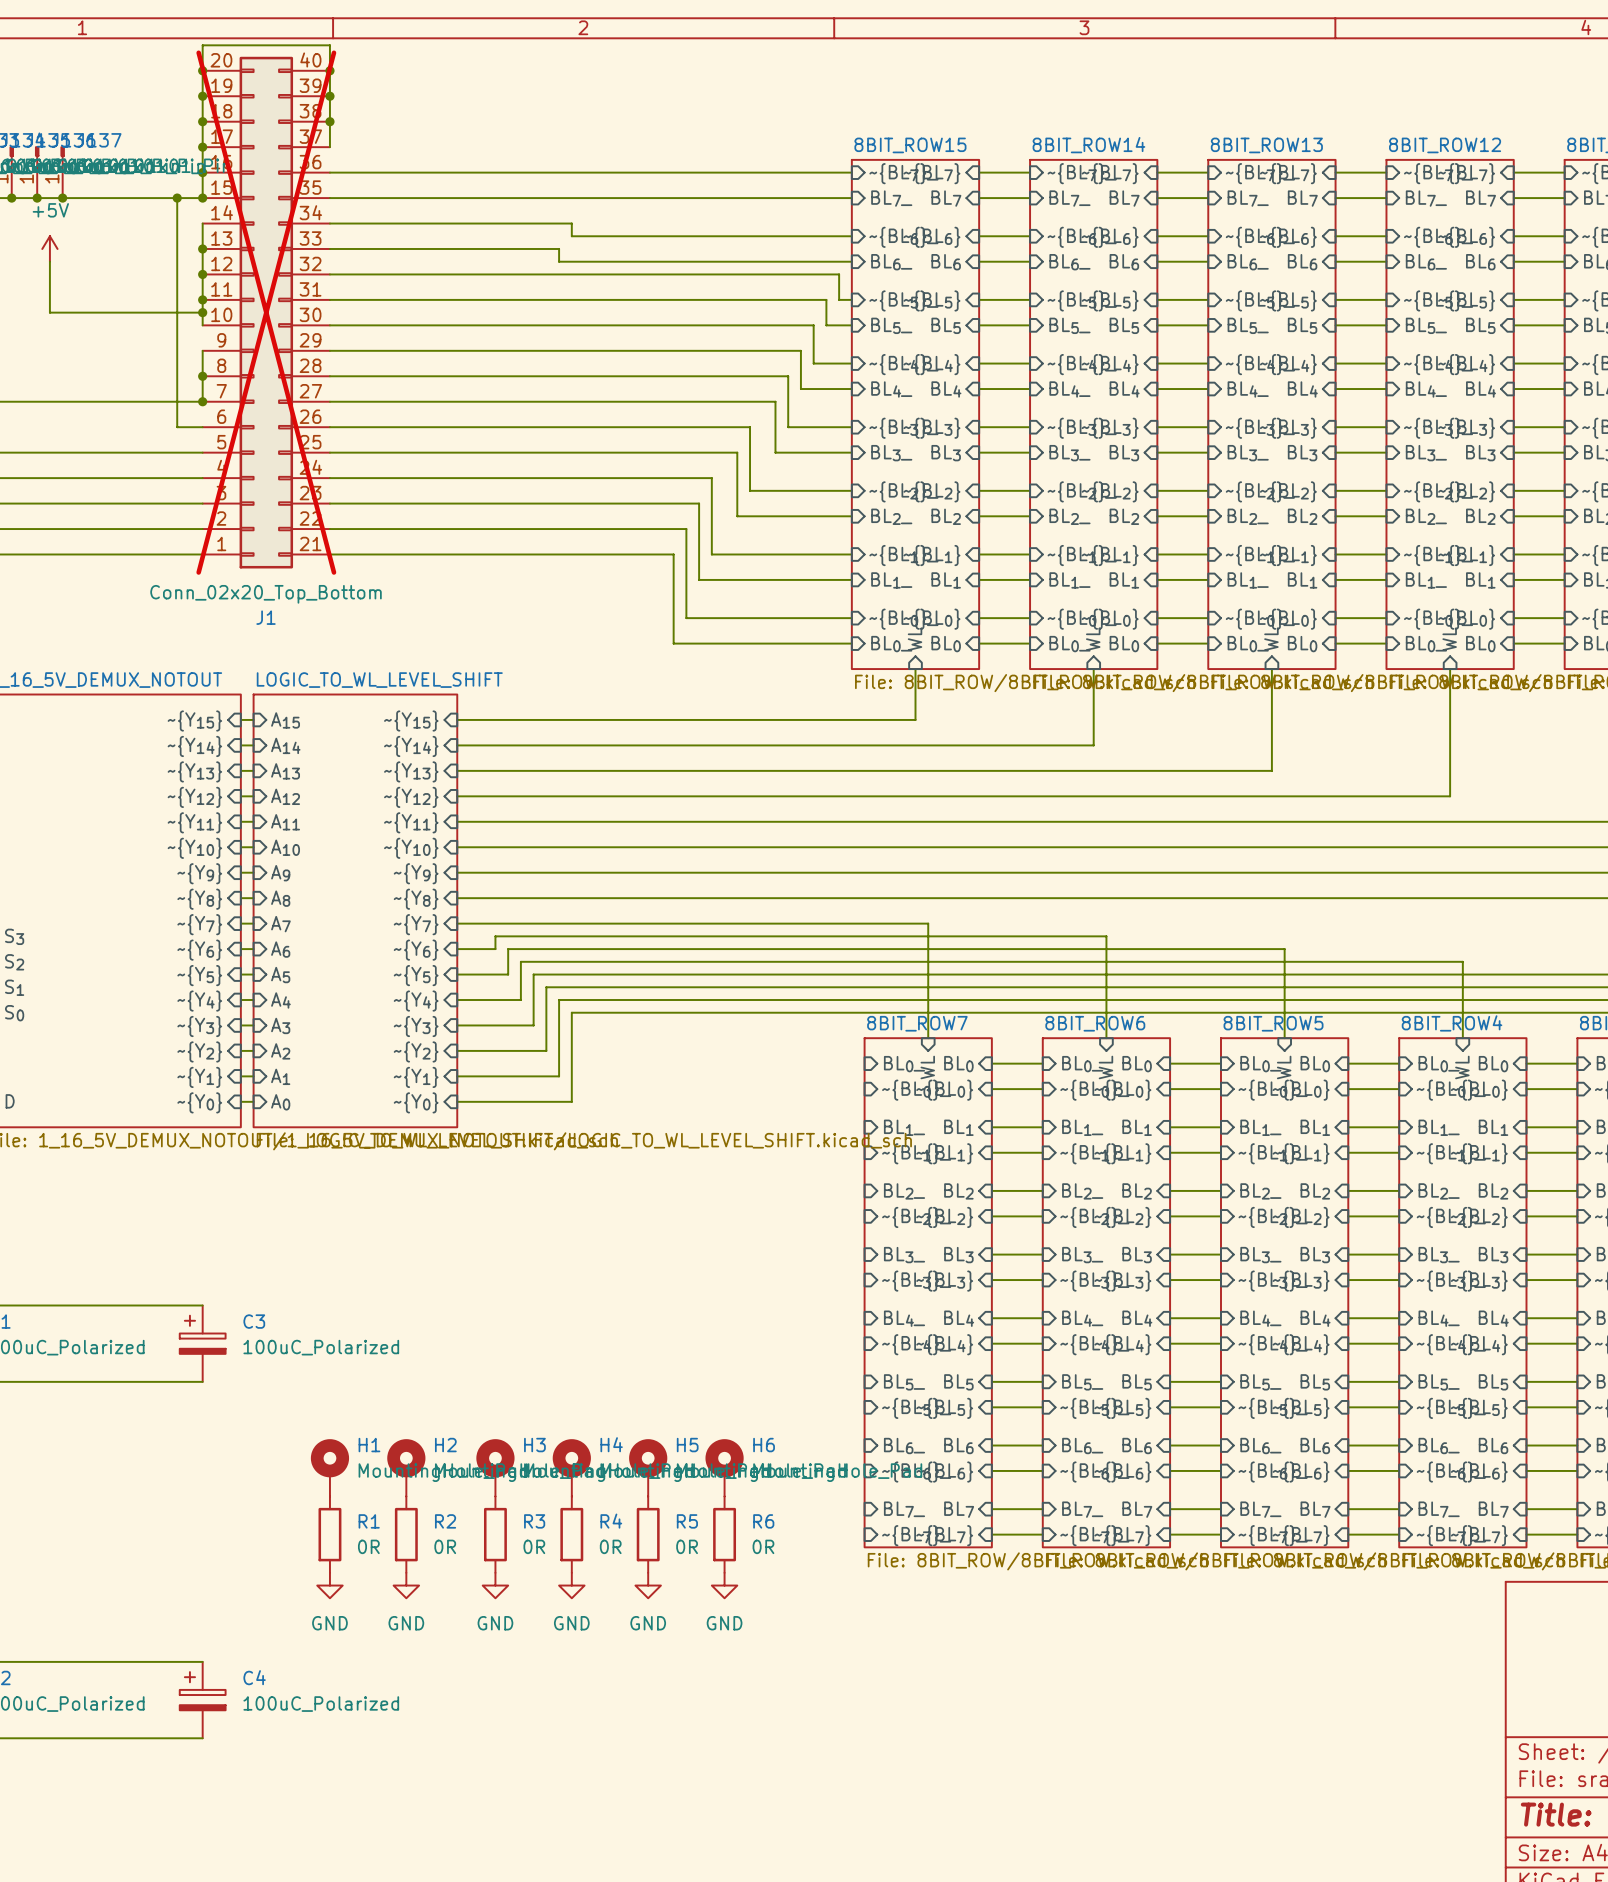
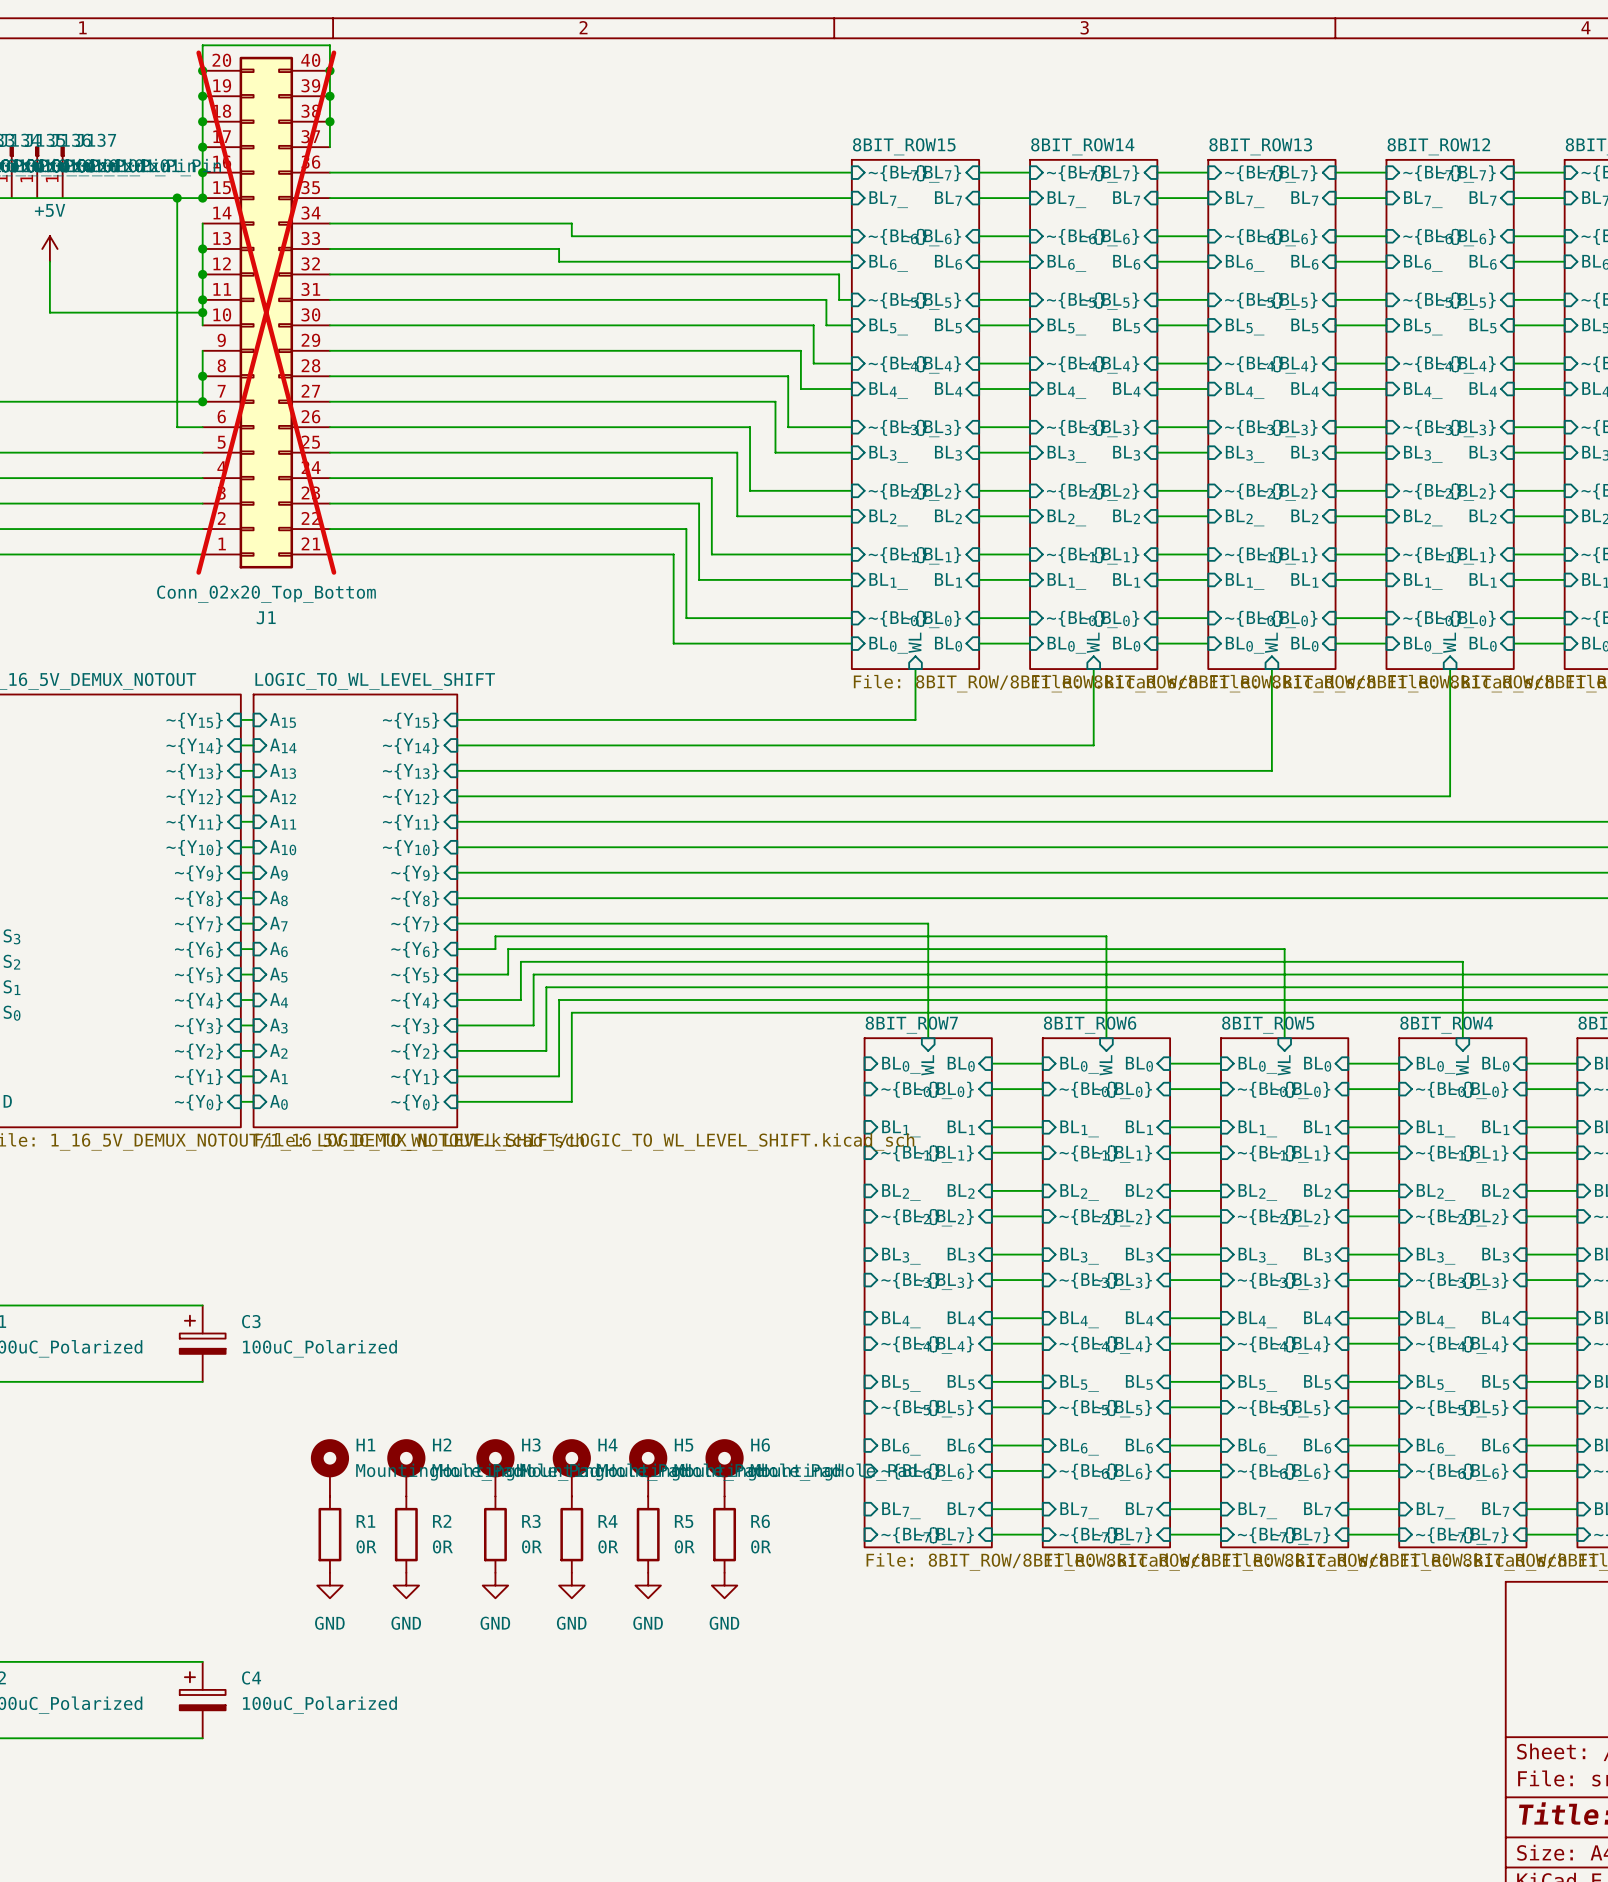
junction: (11, 198) -> none
junction: (37, 198) -> none
junction: (62, 198) -> none

